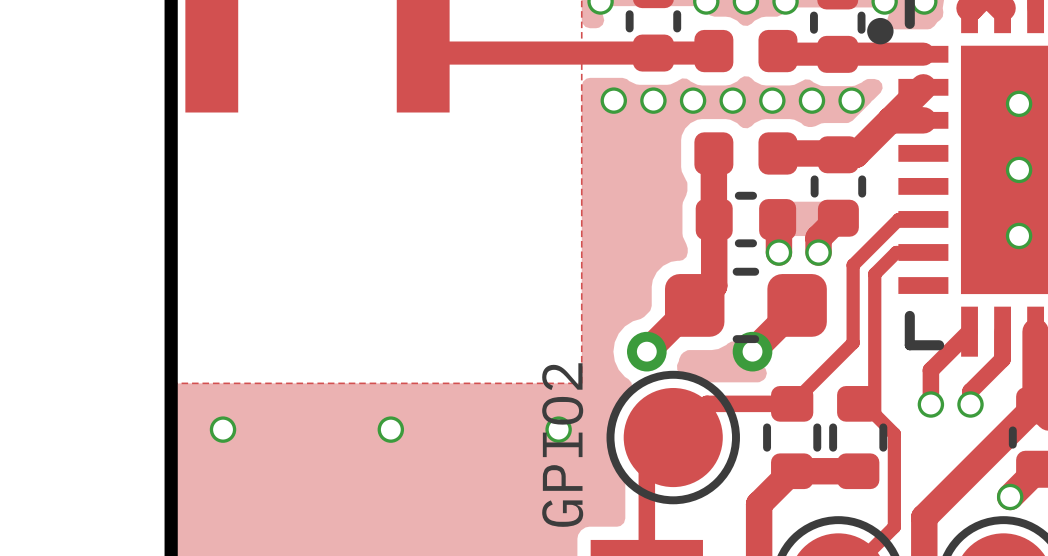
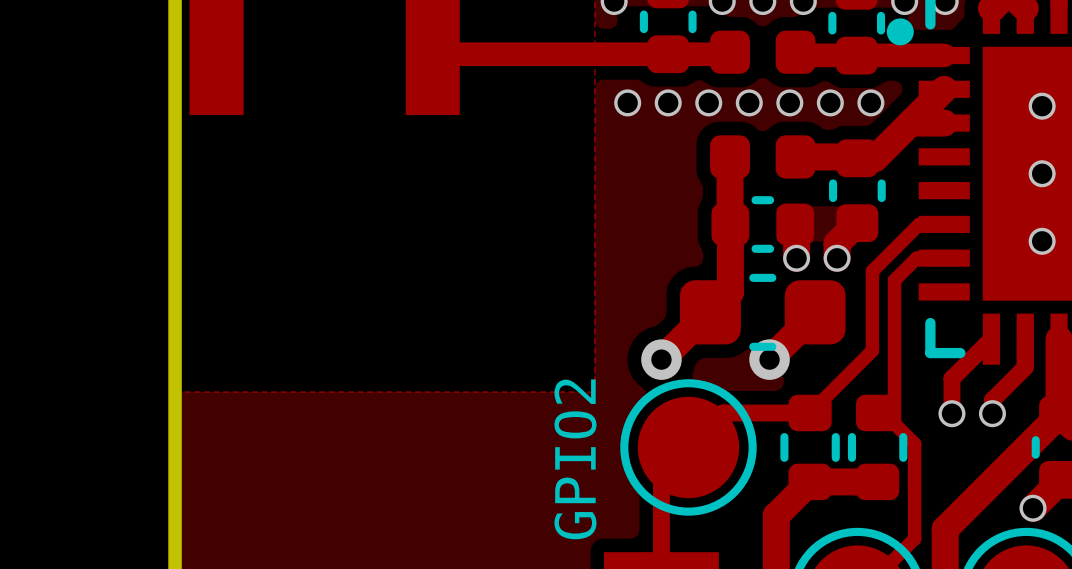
via: (223, 429) -> none
via: (390, 429) -> none
via: (558, 429) -> none

